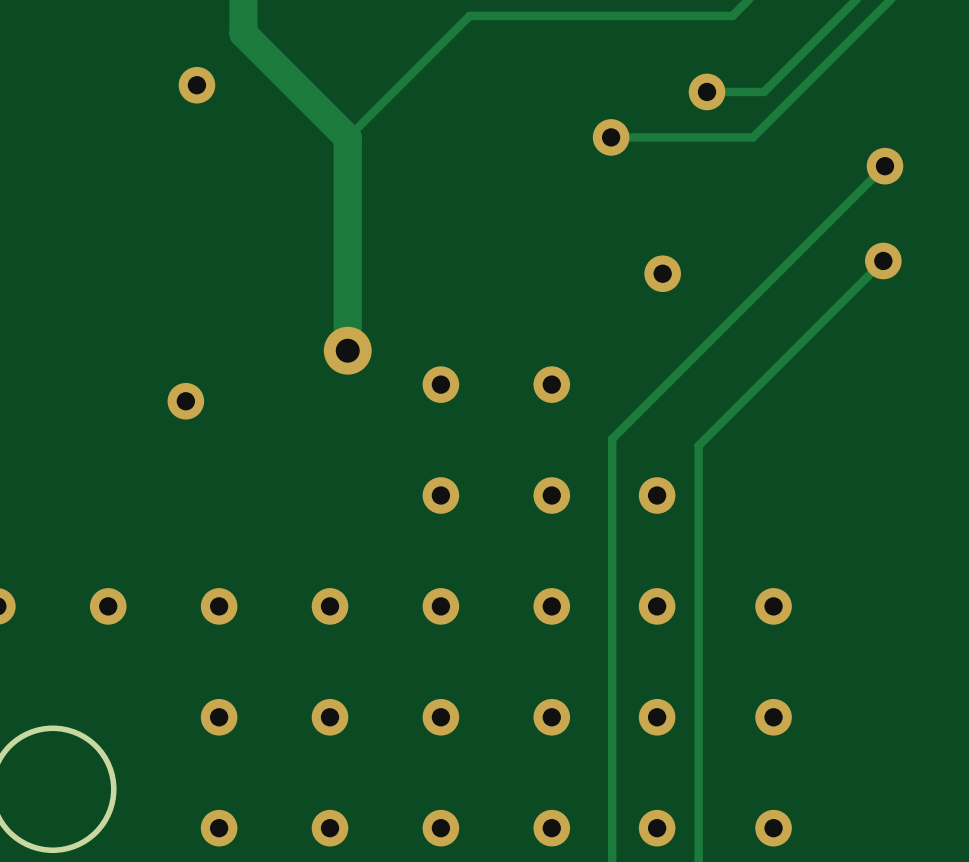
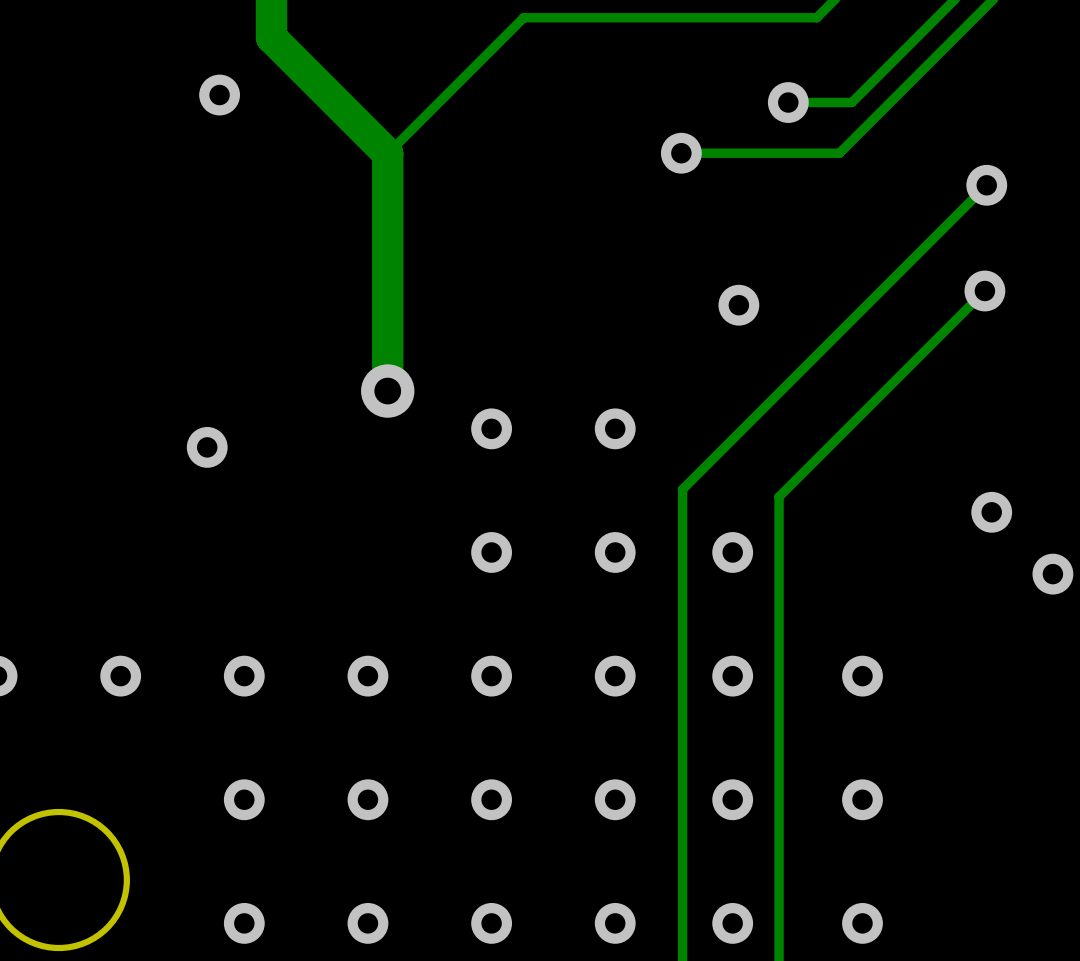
via: none -> (991, 512)
via: none -> (1052, 574)

